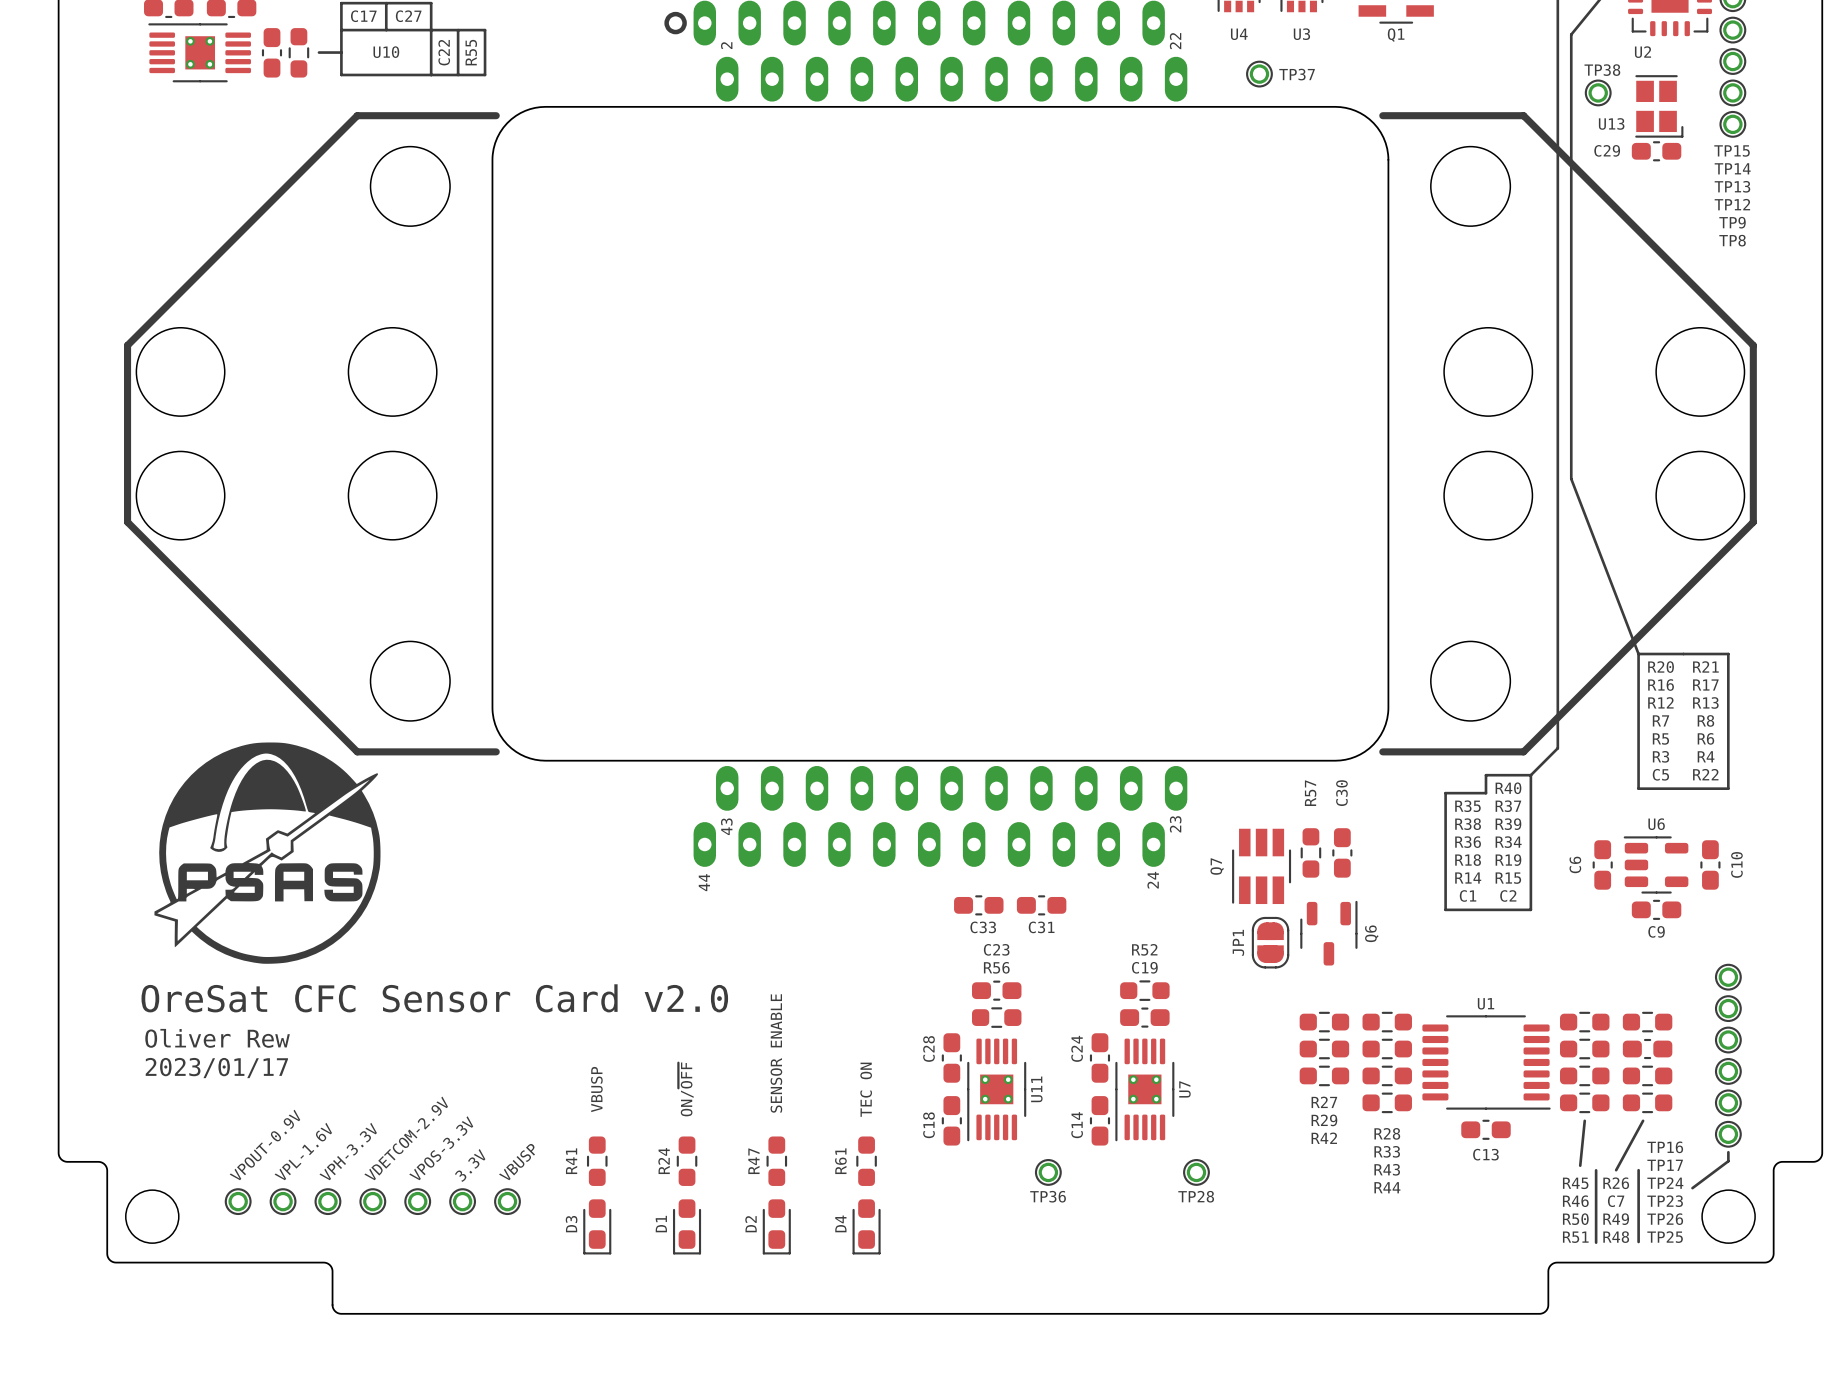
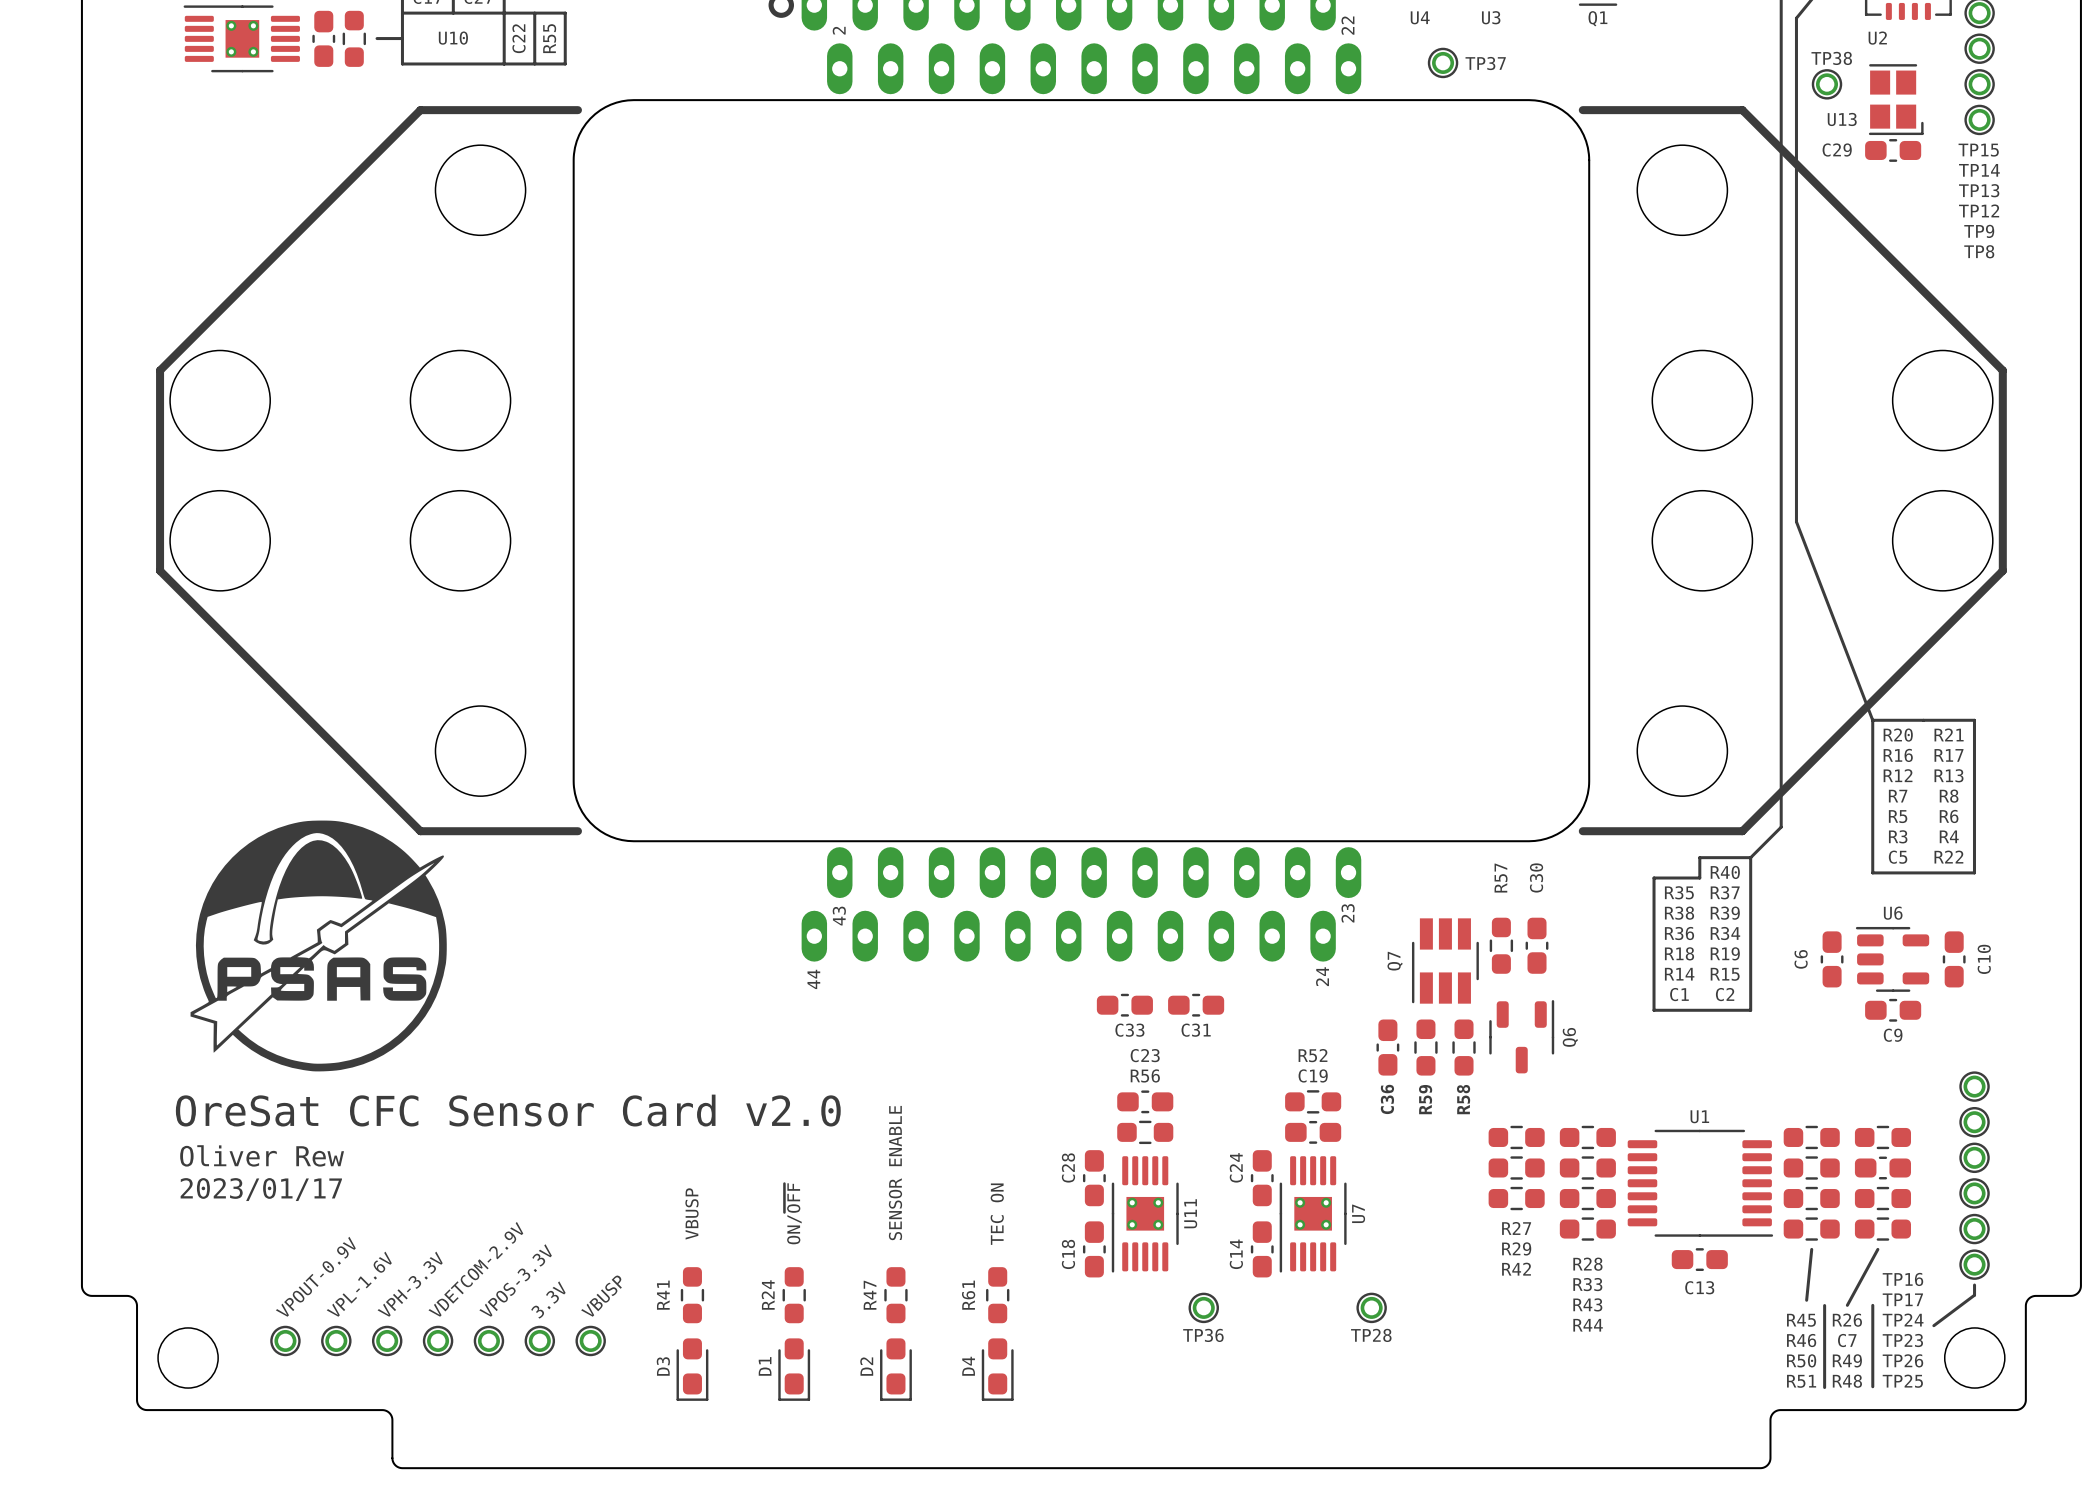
C36: none -> (1387, 1047)
R59: none -> (1425, 1047)
JP1: (1270, 942) -> none
R58: none -> (1464, 1047)

